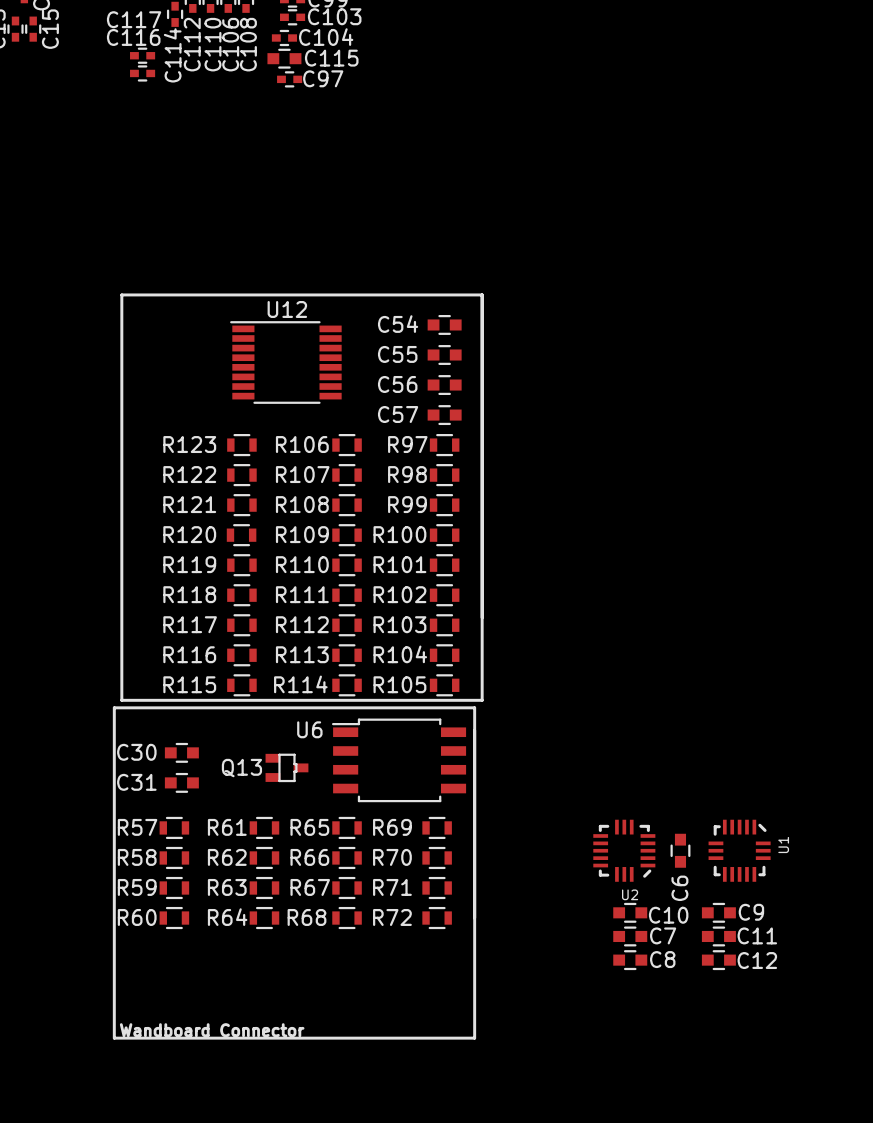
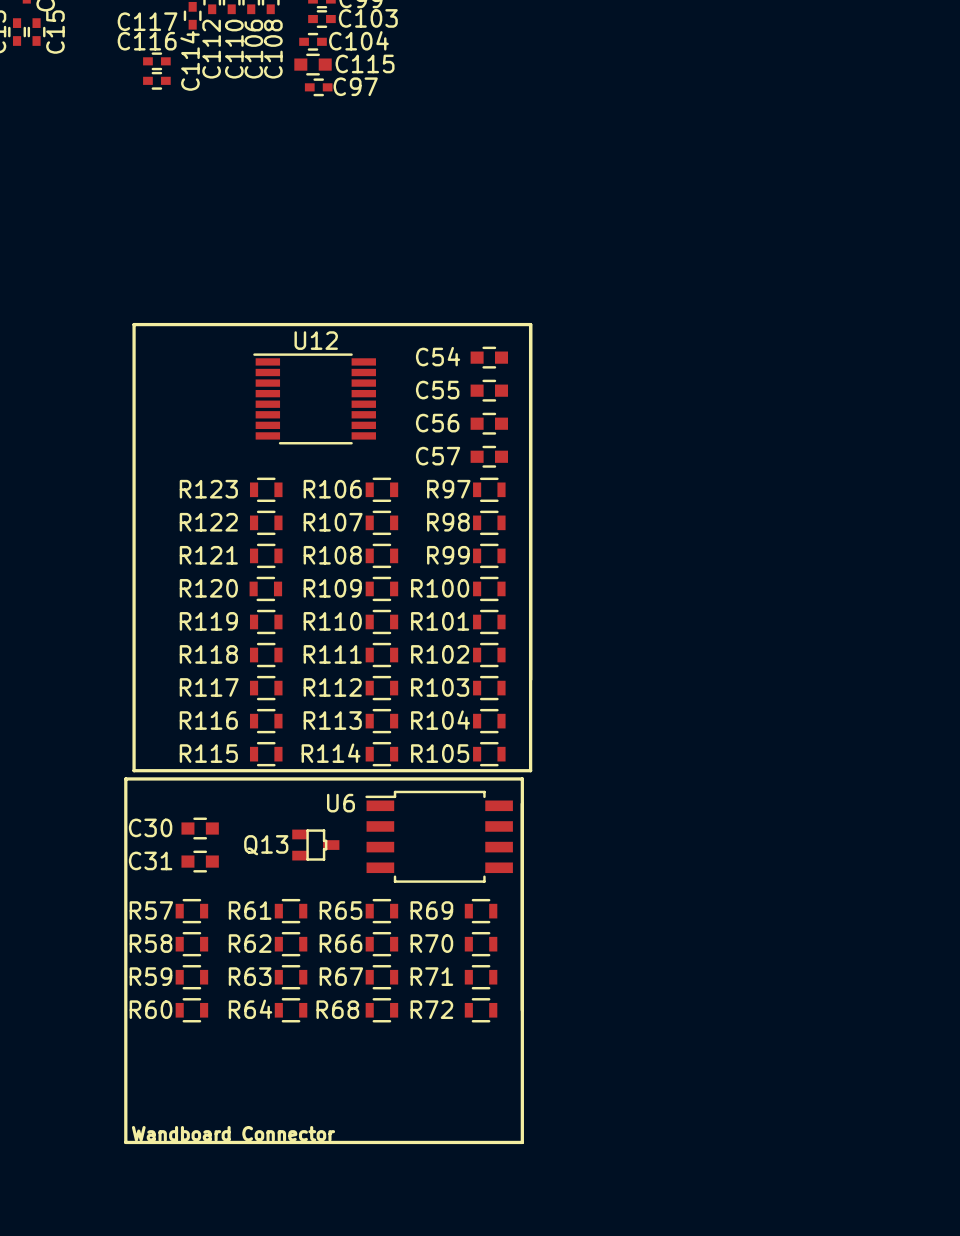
U2: (624, 850) -> none
C6: (680, 850) -> none
U1: (739, 850) -> none
C10: (630, 912) -> none
C9: (718, 912) -> none
C7: (630, 936) -> none
C11: (718, 936) -> none
C8: (630, 960) -> none
C12: (718, 960) -> none

